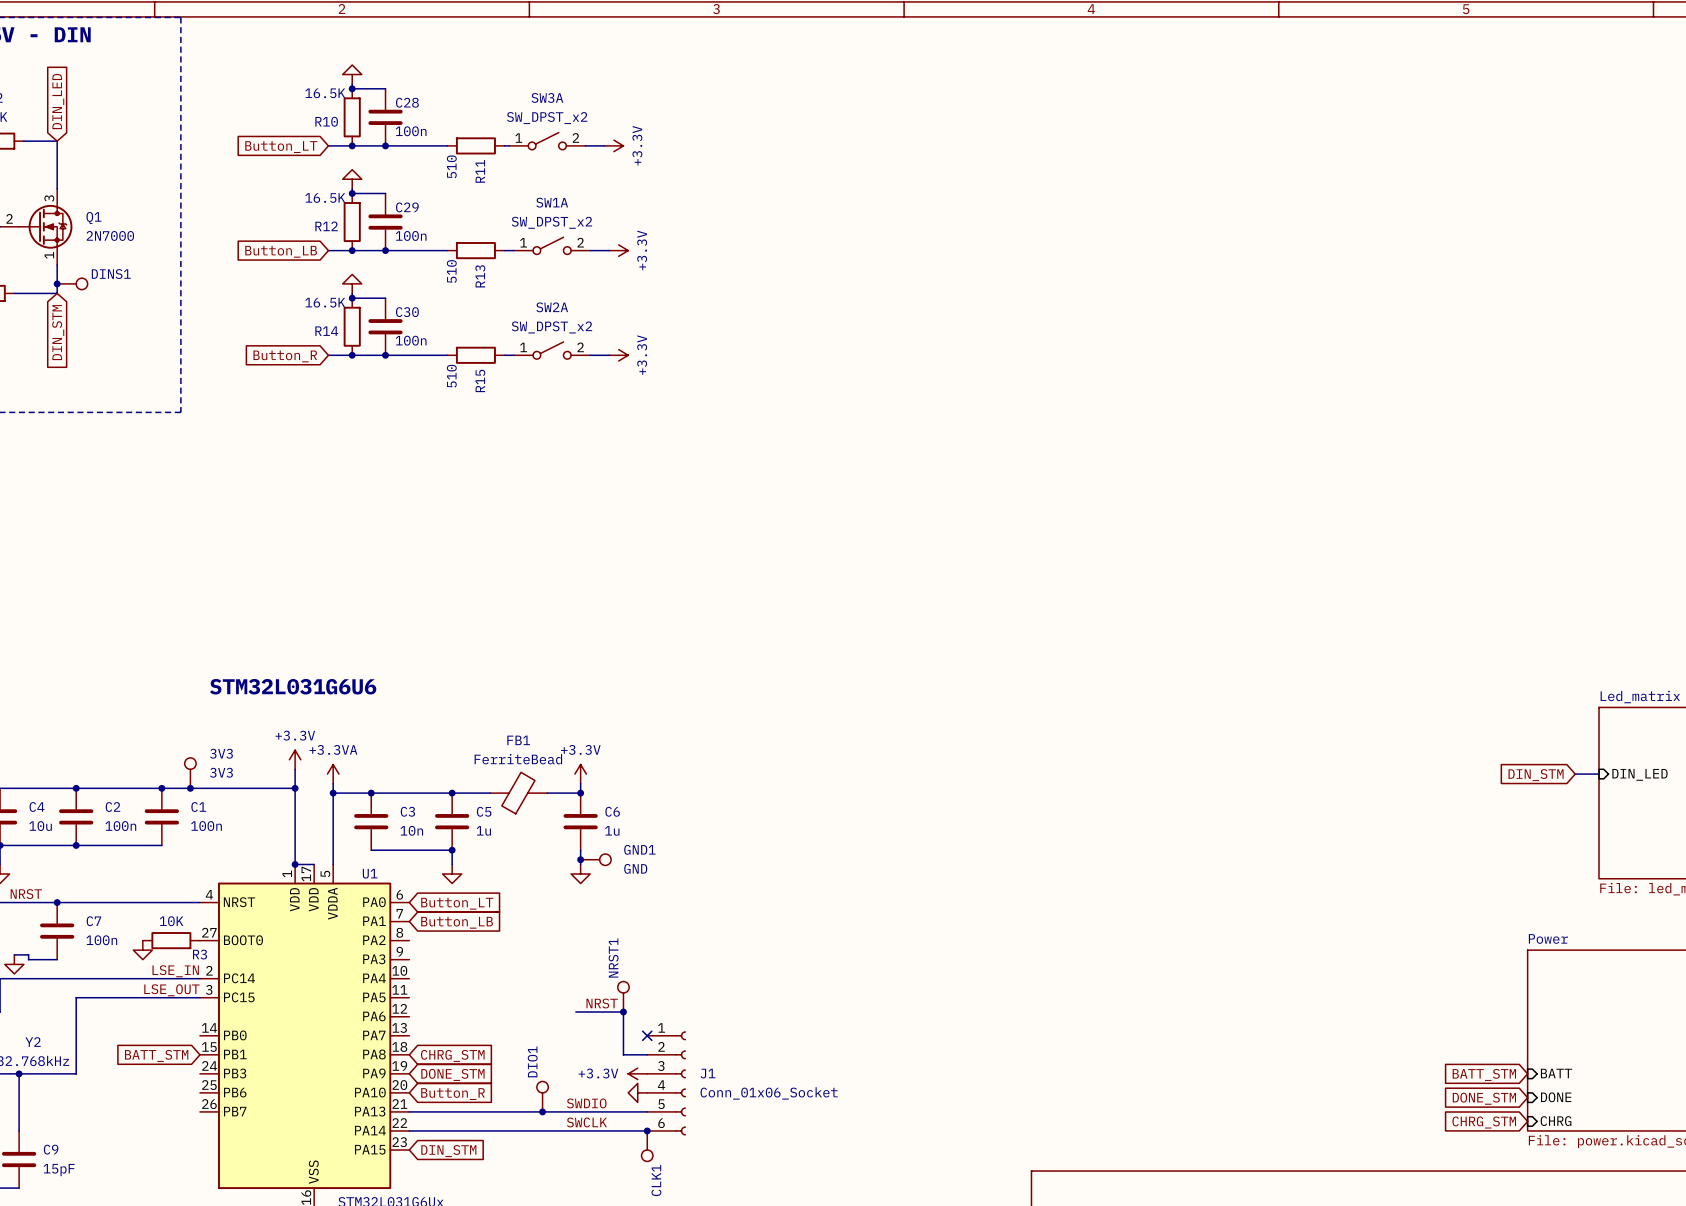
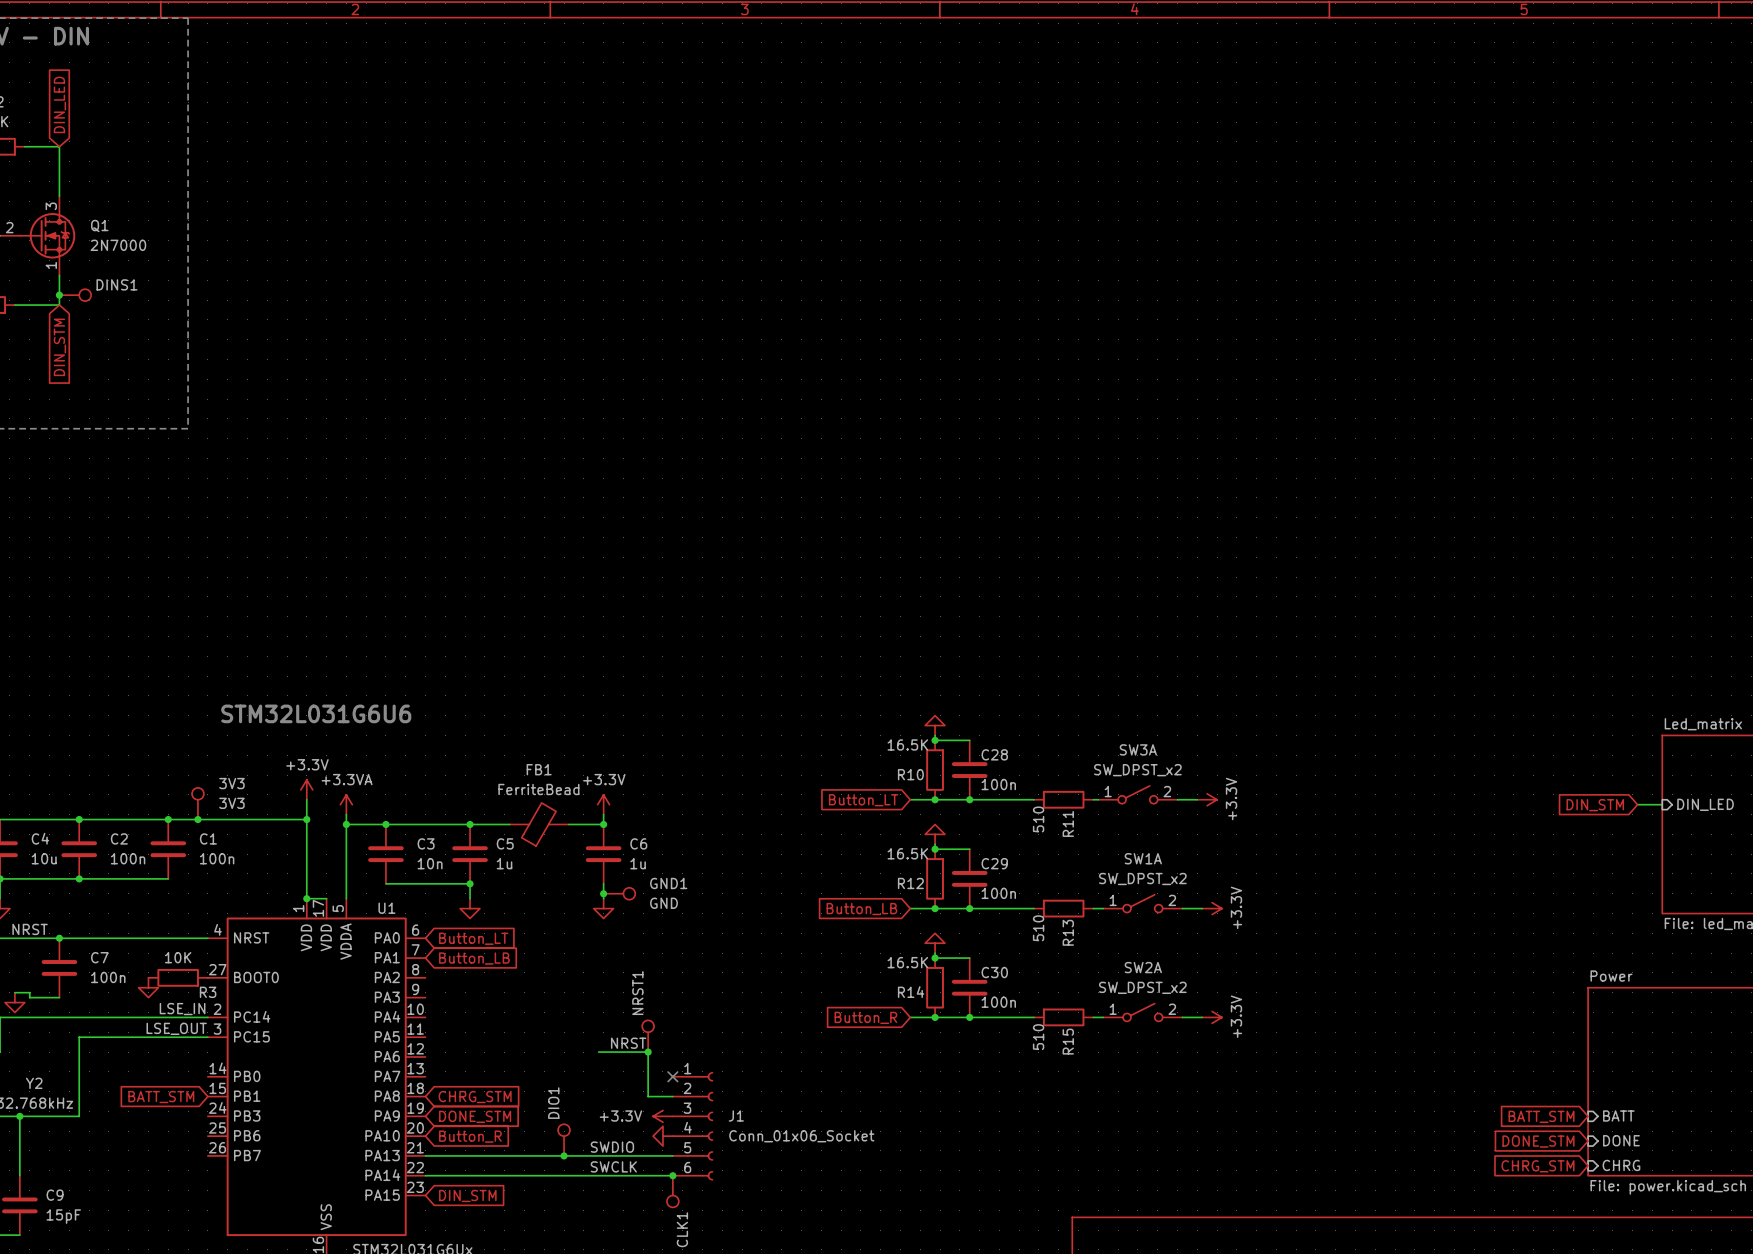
power symbol: (352, 74) -> none
wire: (352, 84) (352, 88) (385, 88) -> none
junction: (352, 88) -> none
R10 position: (352, 117) -> (935, 770)
C28 position: (385, 117) -> (969, 770)
SW3A position: (547, 141) -> (1137, 794)
wire: (328, 145) (447, 145) -> none
junction: (352, 145) -> none
junction: (385, 145) -> none
R11 position: (475, 145) -> (1063, 799)
wire: (504, 145) (509, 145) -> none
wire: (585, 145) (604, 145) -> none
power symbol: +3.3V (613, 145) -> none
global label: Button_LT (281, 147) -> none
power symbol: (352, 179) -> none
wire: (352, 188) (352, 193) (385, 193) -> none
junction: (352, 193) -> none
R12 position: (352, 222) -> (935, 878)
C29 position: (385, 222) -> (969, 878)
SW1A position: (552, 245) -> (1142, 903)
wire: (328, 250) (447, 250) -> none
junction: (352, 250) -> none
junction: (385, 250) -> none
R13 position: (475, 250) -> (1063, 908)
wire: (504, 250) (514, 250) -> none
wire: (590, 250) (609, 250) -> none
power symbol: +3.3V (618, 250) -> none
global label: Button_LB (281, 251) -> none
power symbol: (352, 283) -> none
wire: (352, 293) (352, 298) (385, 298) -> none
junction: (352, 298) -> none
R14 position: (352, 326) -> (935, 987)
C30 position: (385, 326) -> (969, 987)
SW2A position: (552, 350) -> (1142, 1012)
wire: (328, 355) (447, 355) -> none
junction: (352, 355) -> none
junction: (385, 355) -> none
R15 position: (475, 355) -> (1063, 1017)
wire: (504, 355) (514, 355) -> none
wire: (590, 355) (609, 355) -> none
power symbol: +3.3V (618, 355) -> none
global label: Button_R (285, 356) -> none
power symbol: none -> (935, 725)
wire: none -> (935, 735) (935, 740) (969, 740)
junction: none -> (935, 740)
wire: none -> (910, 799) (1034, 799)
junction: none -> (935, 799)
junction: none -> (969, 799)
wire: none -> (1093, 799) (1098, 799)
wire: none -> (1177, 799) (1197, 799)
power symbol: none -> +3.3V (1207, 799)
global label: none -> Button_LT (863, 800)
power symbol: none -> (935, 834)
wire: none -> (935, 844) (935, 849) (969, 849)
junction: none -> (935, 849)
wire: none -> (910, 908) (1034, 908)
junction: none -> (935, 908)
junction: none -> (969, 908)
wire: none -> (1093, 908) (1103, 908)
wire: none -> (1182, 908) (1202, 908)
power symbol: none -> +3.3V (1212, 908)
global label: none -> Button_LB (861, 909)
power symbol: none -> (935, 943)
wire: none -> (935, 953) (935, 958) (969, 958)
junction: none -> (935, 958)
wire: none -> (910, 1017) (1034, 1017)
junction: none -> (935, 1017)
junction: none -> (969, 1017)
wire: none -> (1093, 1017) (1103, 1017)
wire: none -> (1182, 1017) (1202, 1017)
power symbol: none -> +3.3V (1212, 1017)
global label: none -> Button_R (865, 1017)

